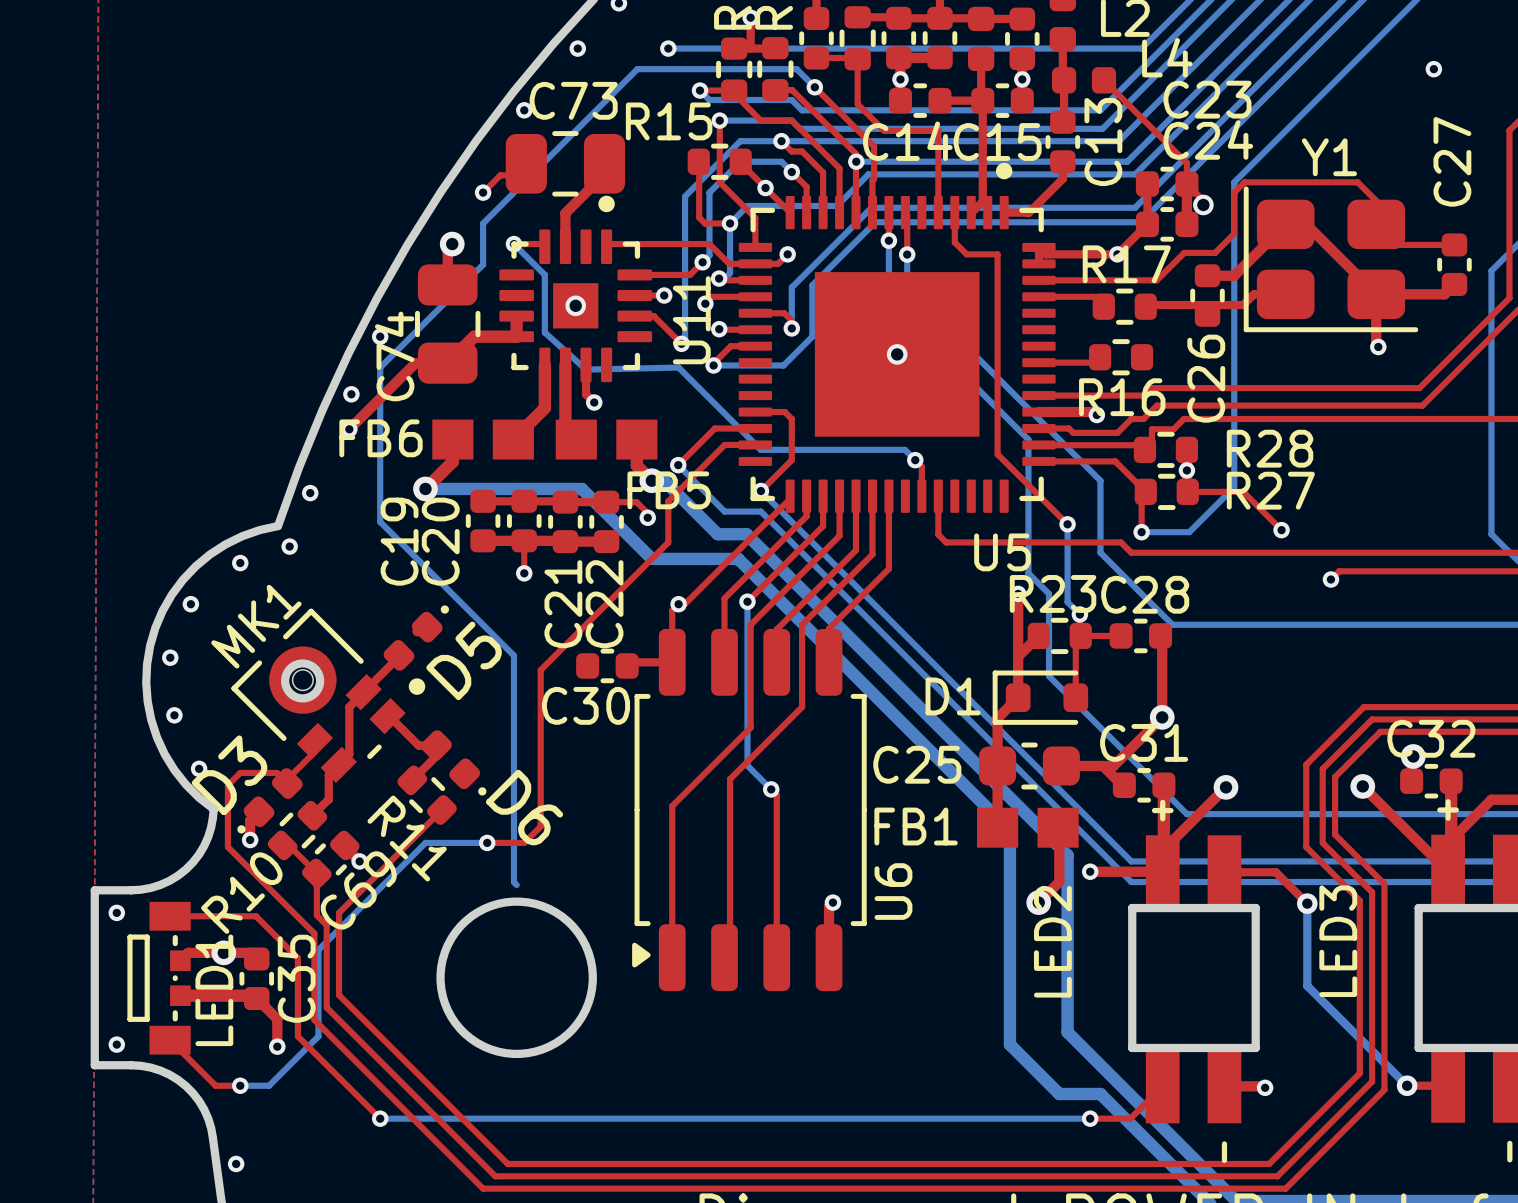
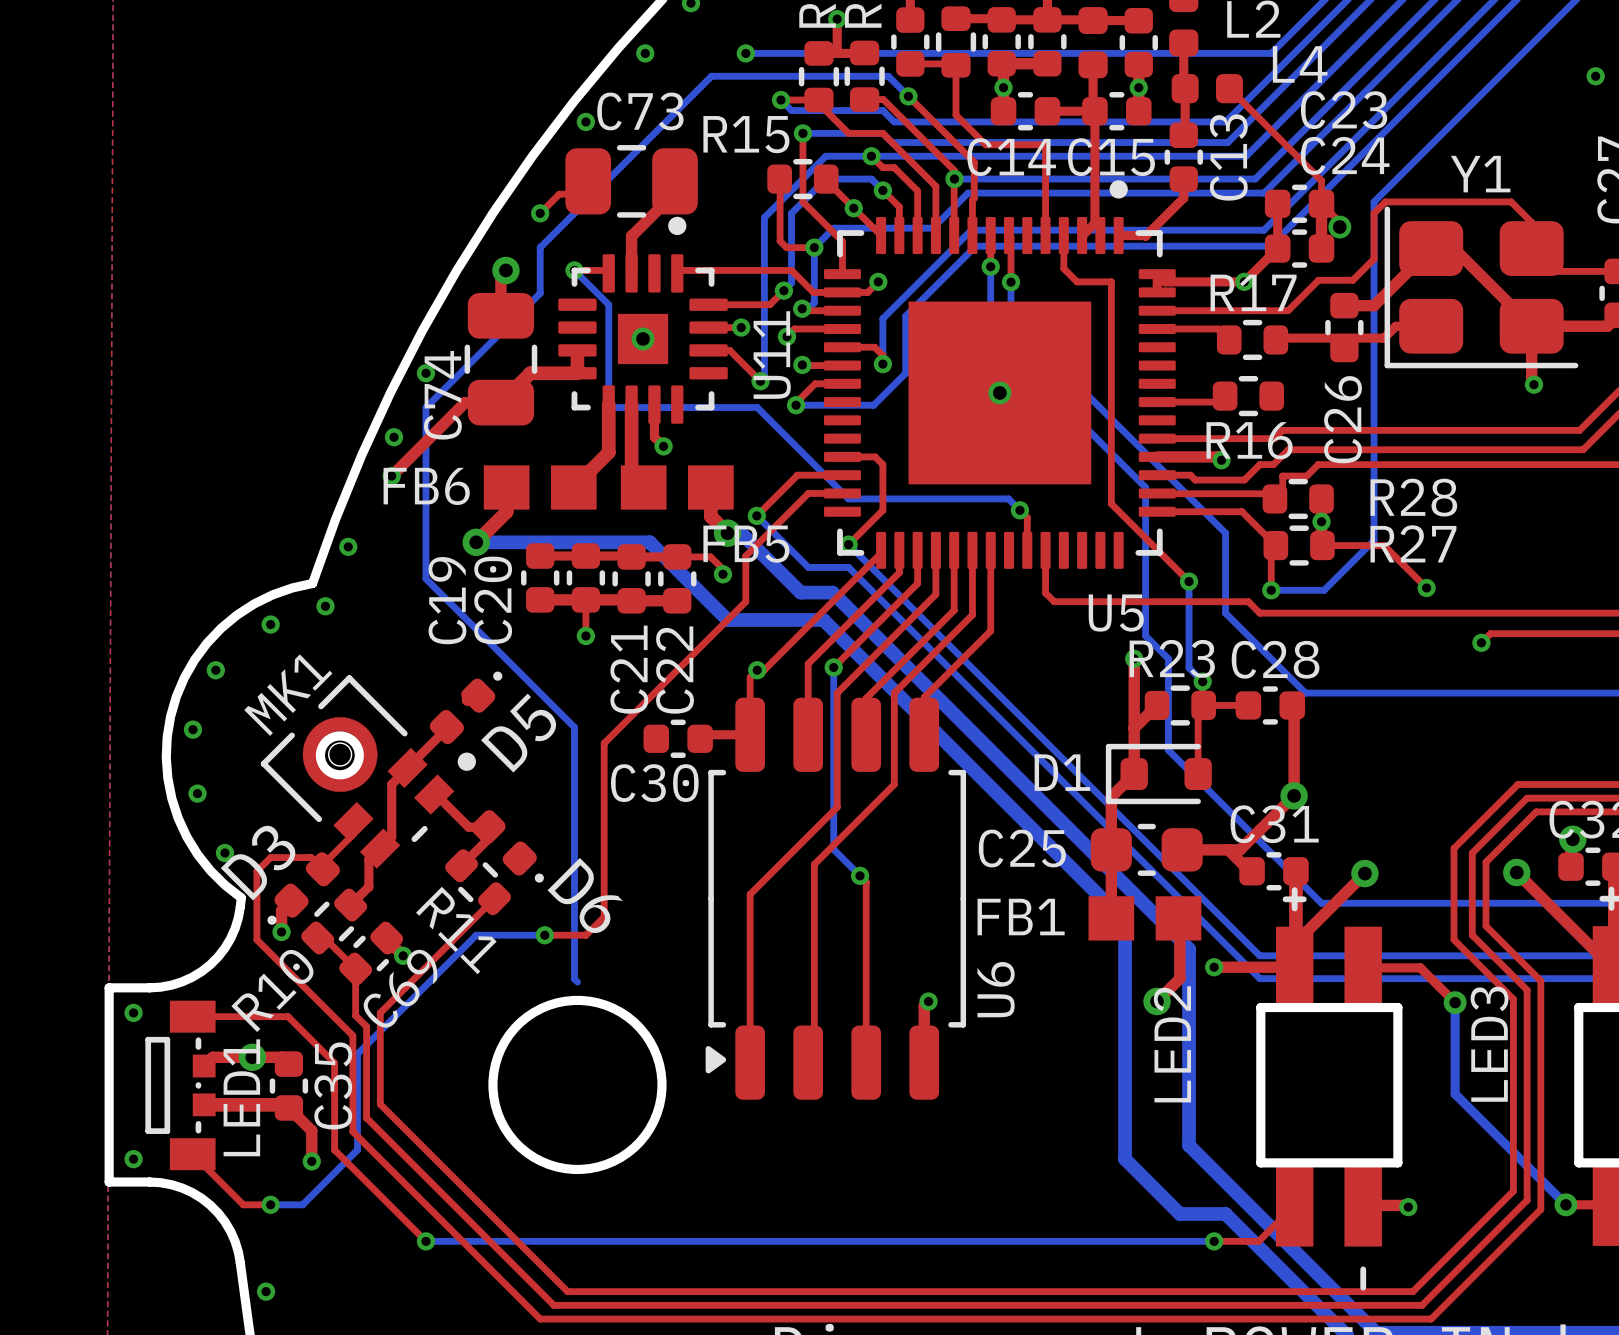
bottom track: (544, 332) (586, 369) (678, 367) -> (608, 368) (608, 407) (757, 407)

